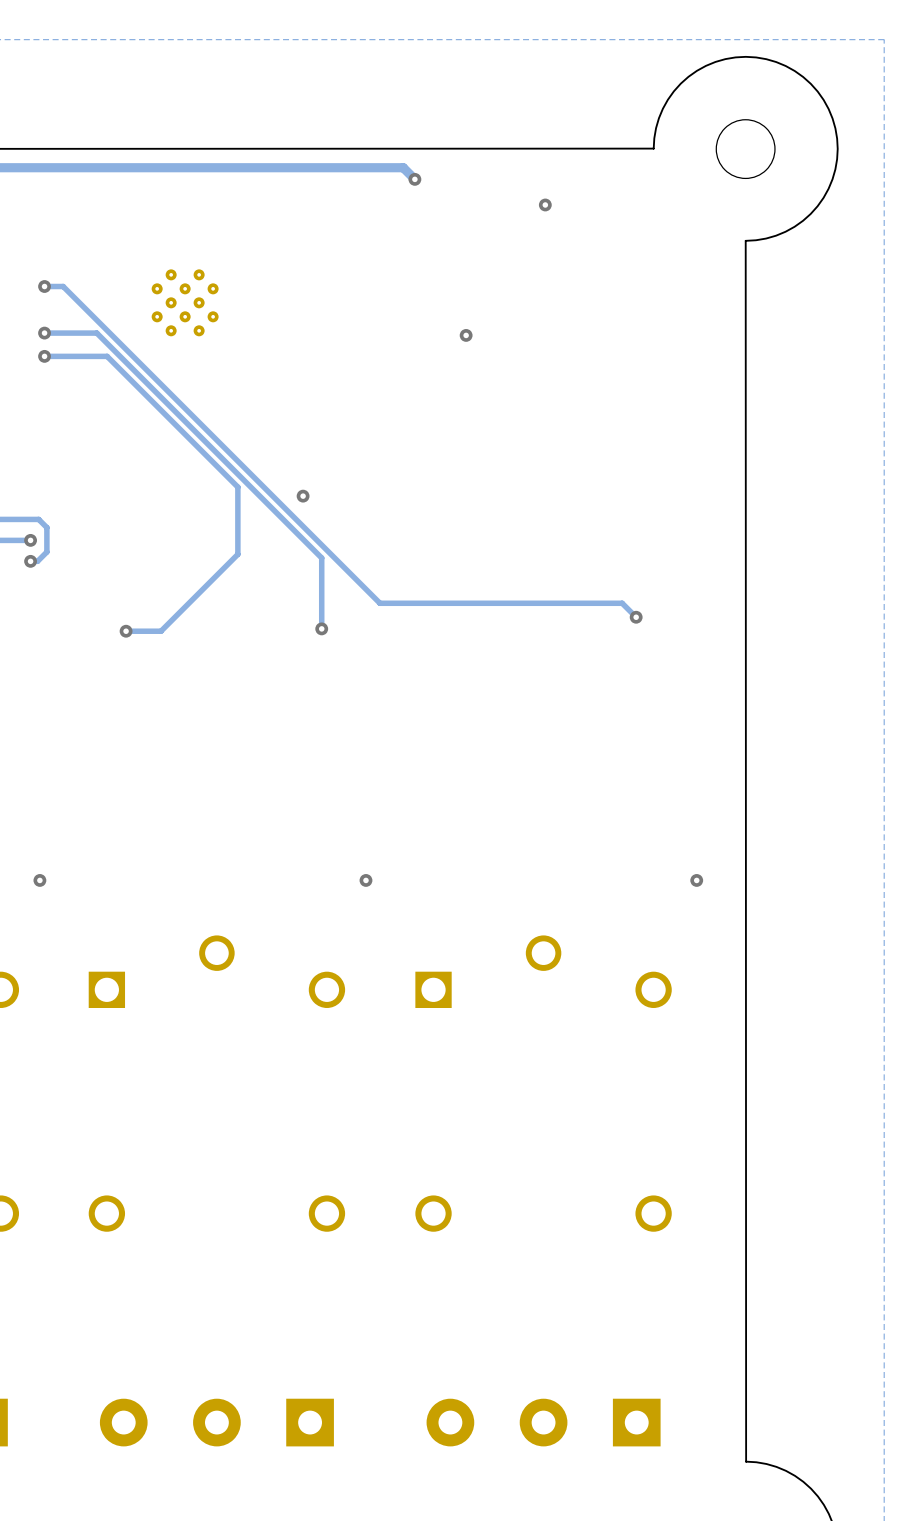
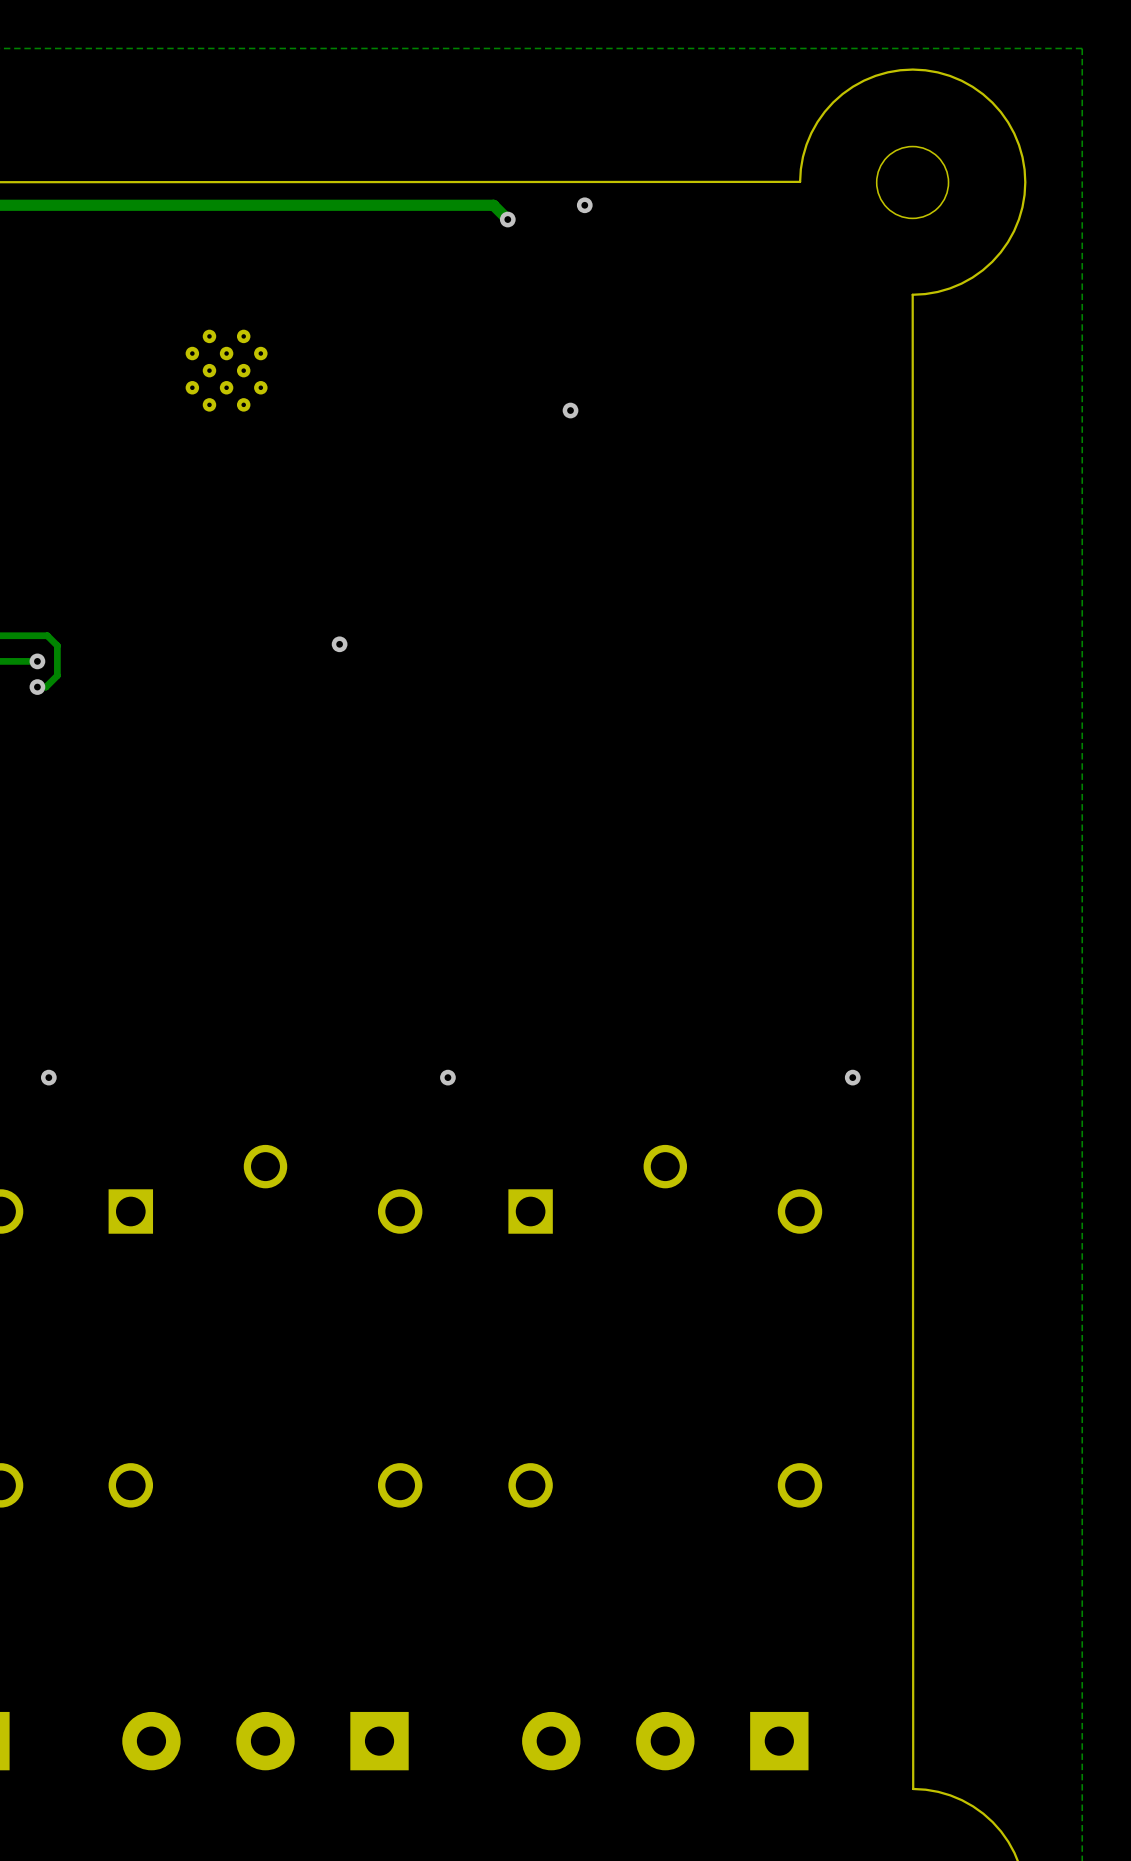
via position: (545, 204) -> (584, 205)
track: (44, 286) (63, 286) (379, 603) (622, 603) (636, 617) -> none
via: (44, 286) -> none
track: (44, 333) (96, 333) (321, 558) (321, 628) -> none
via: (44, 333) -> none
track: (44, 356) (107, 356) (237, 487) (237, 554) (161, 631) (126, 631) -> none
via: (44, 356) -> none
via position: (303, 496) -> (339, 644)
via: (636, 617) -> none
via: (321, 628) -> none
via: (126, 631) -> none

